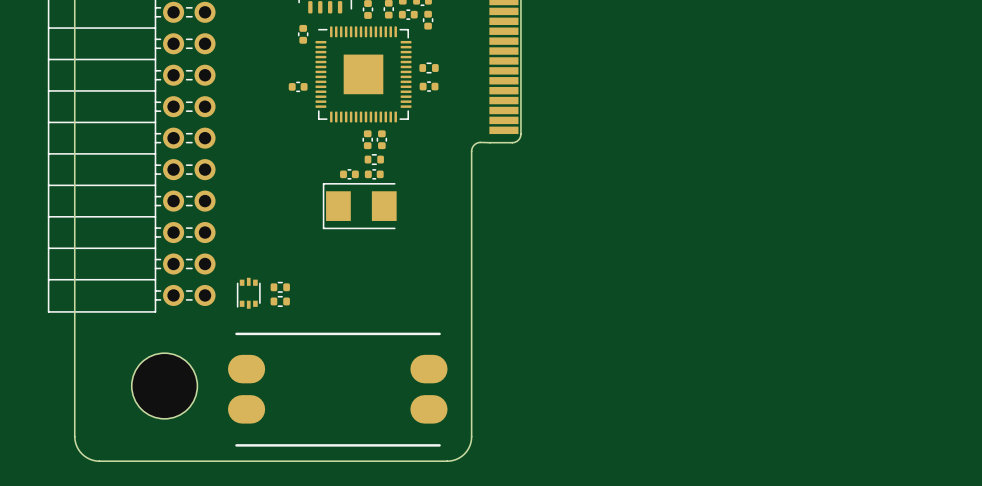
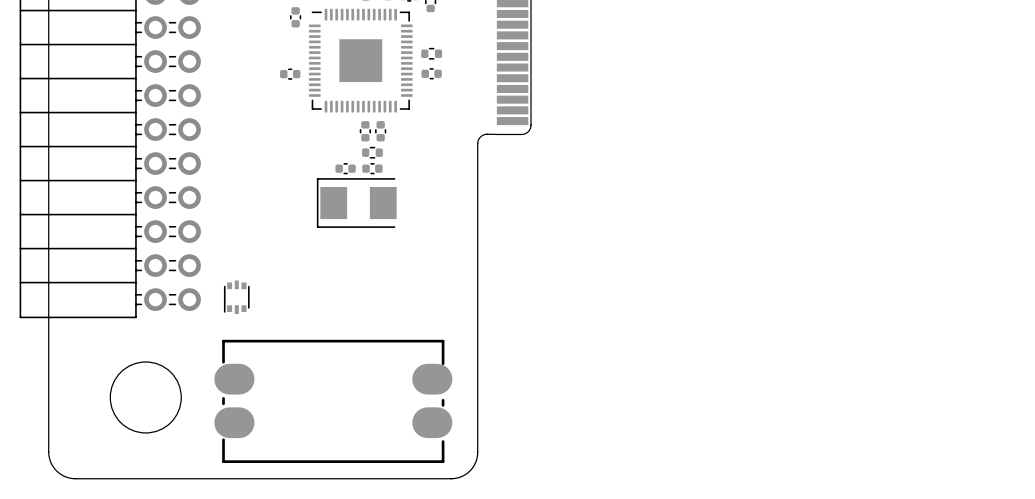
part: (280, 287) -> none
part: (280, 301) -> none
part footprint: [227, 332, 448, 447] -> [214, 339, 453, 463]

